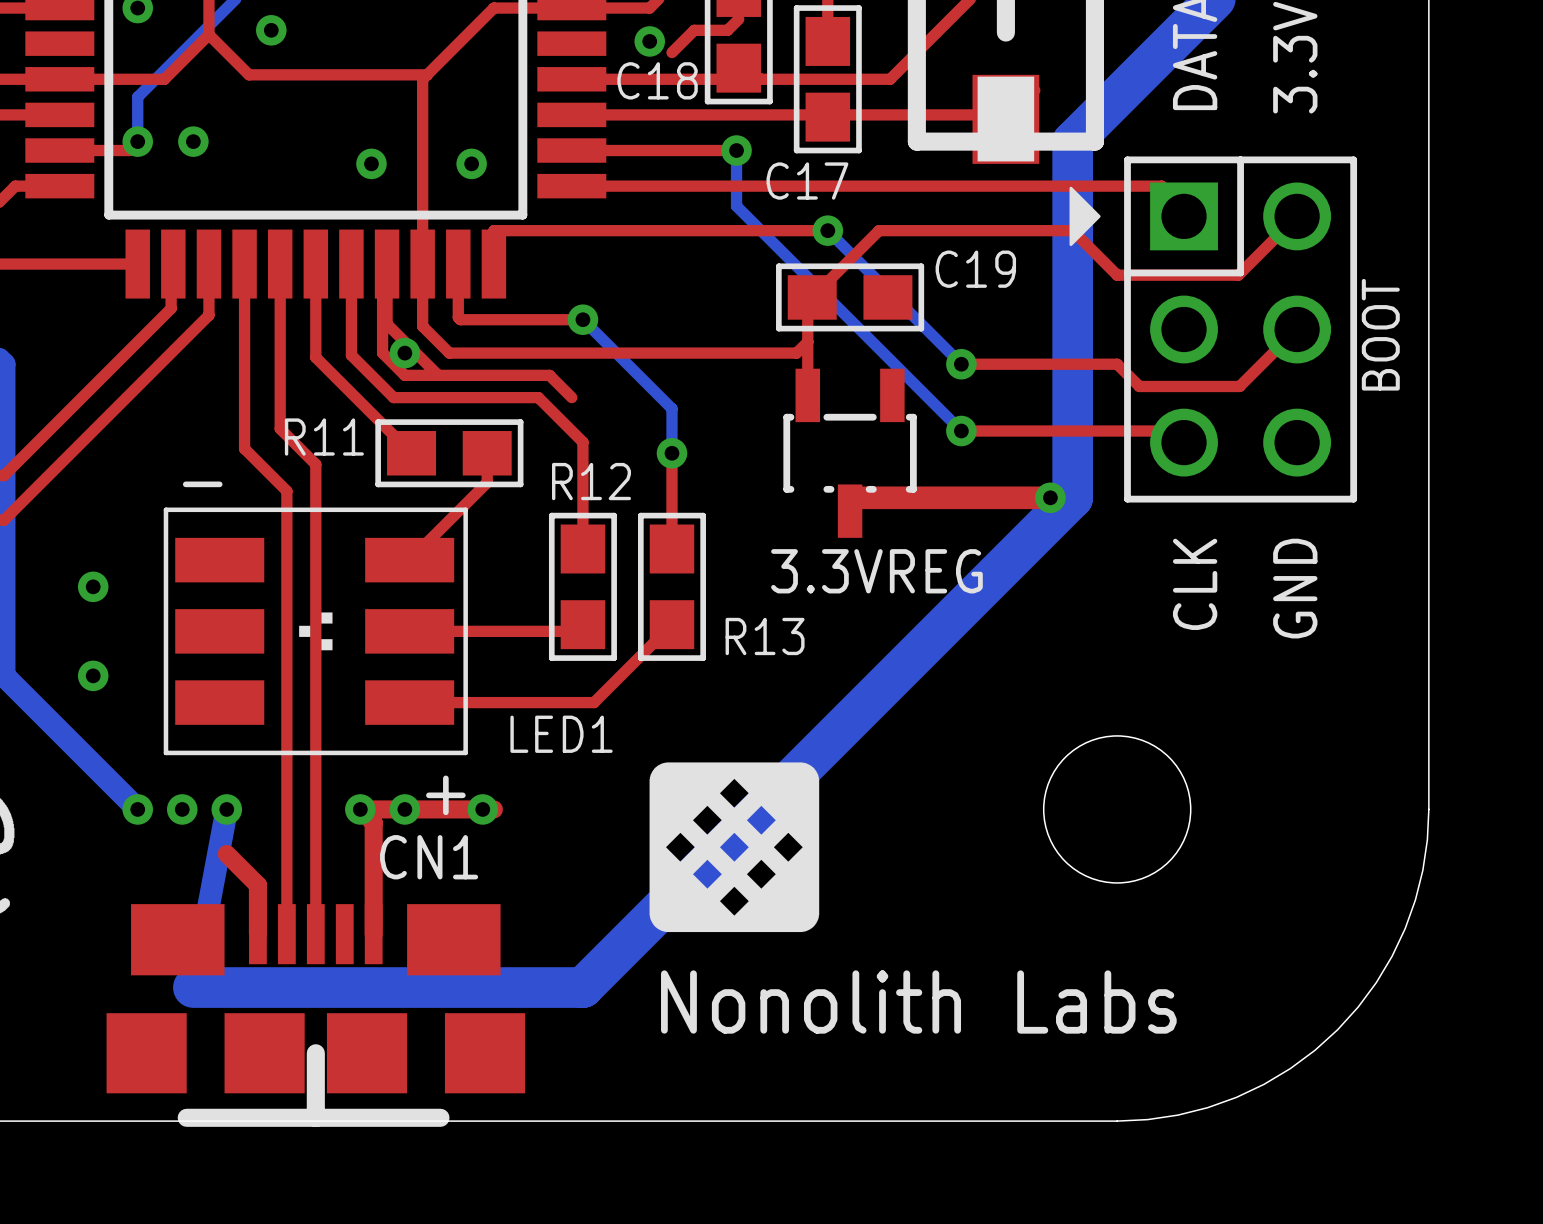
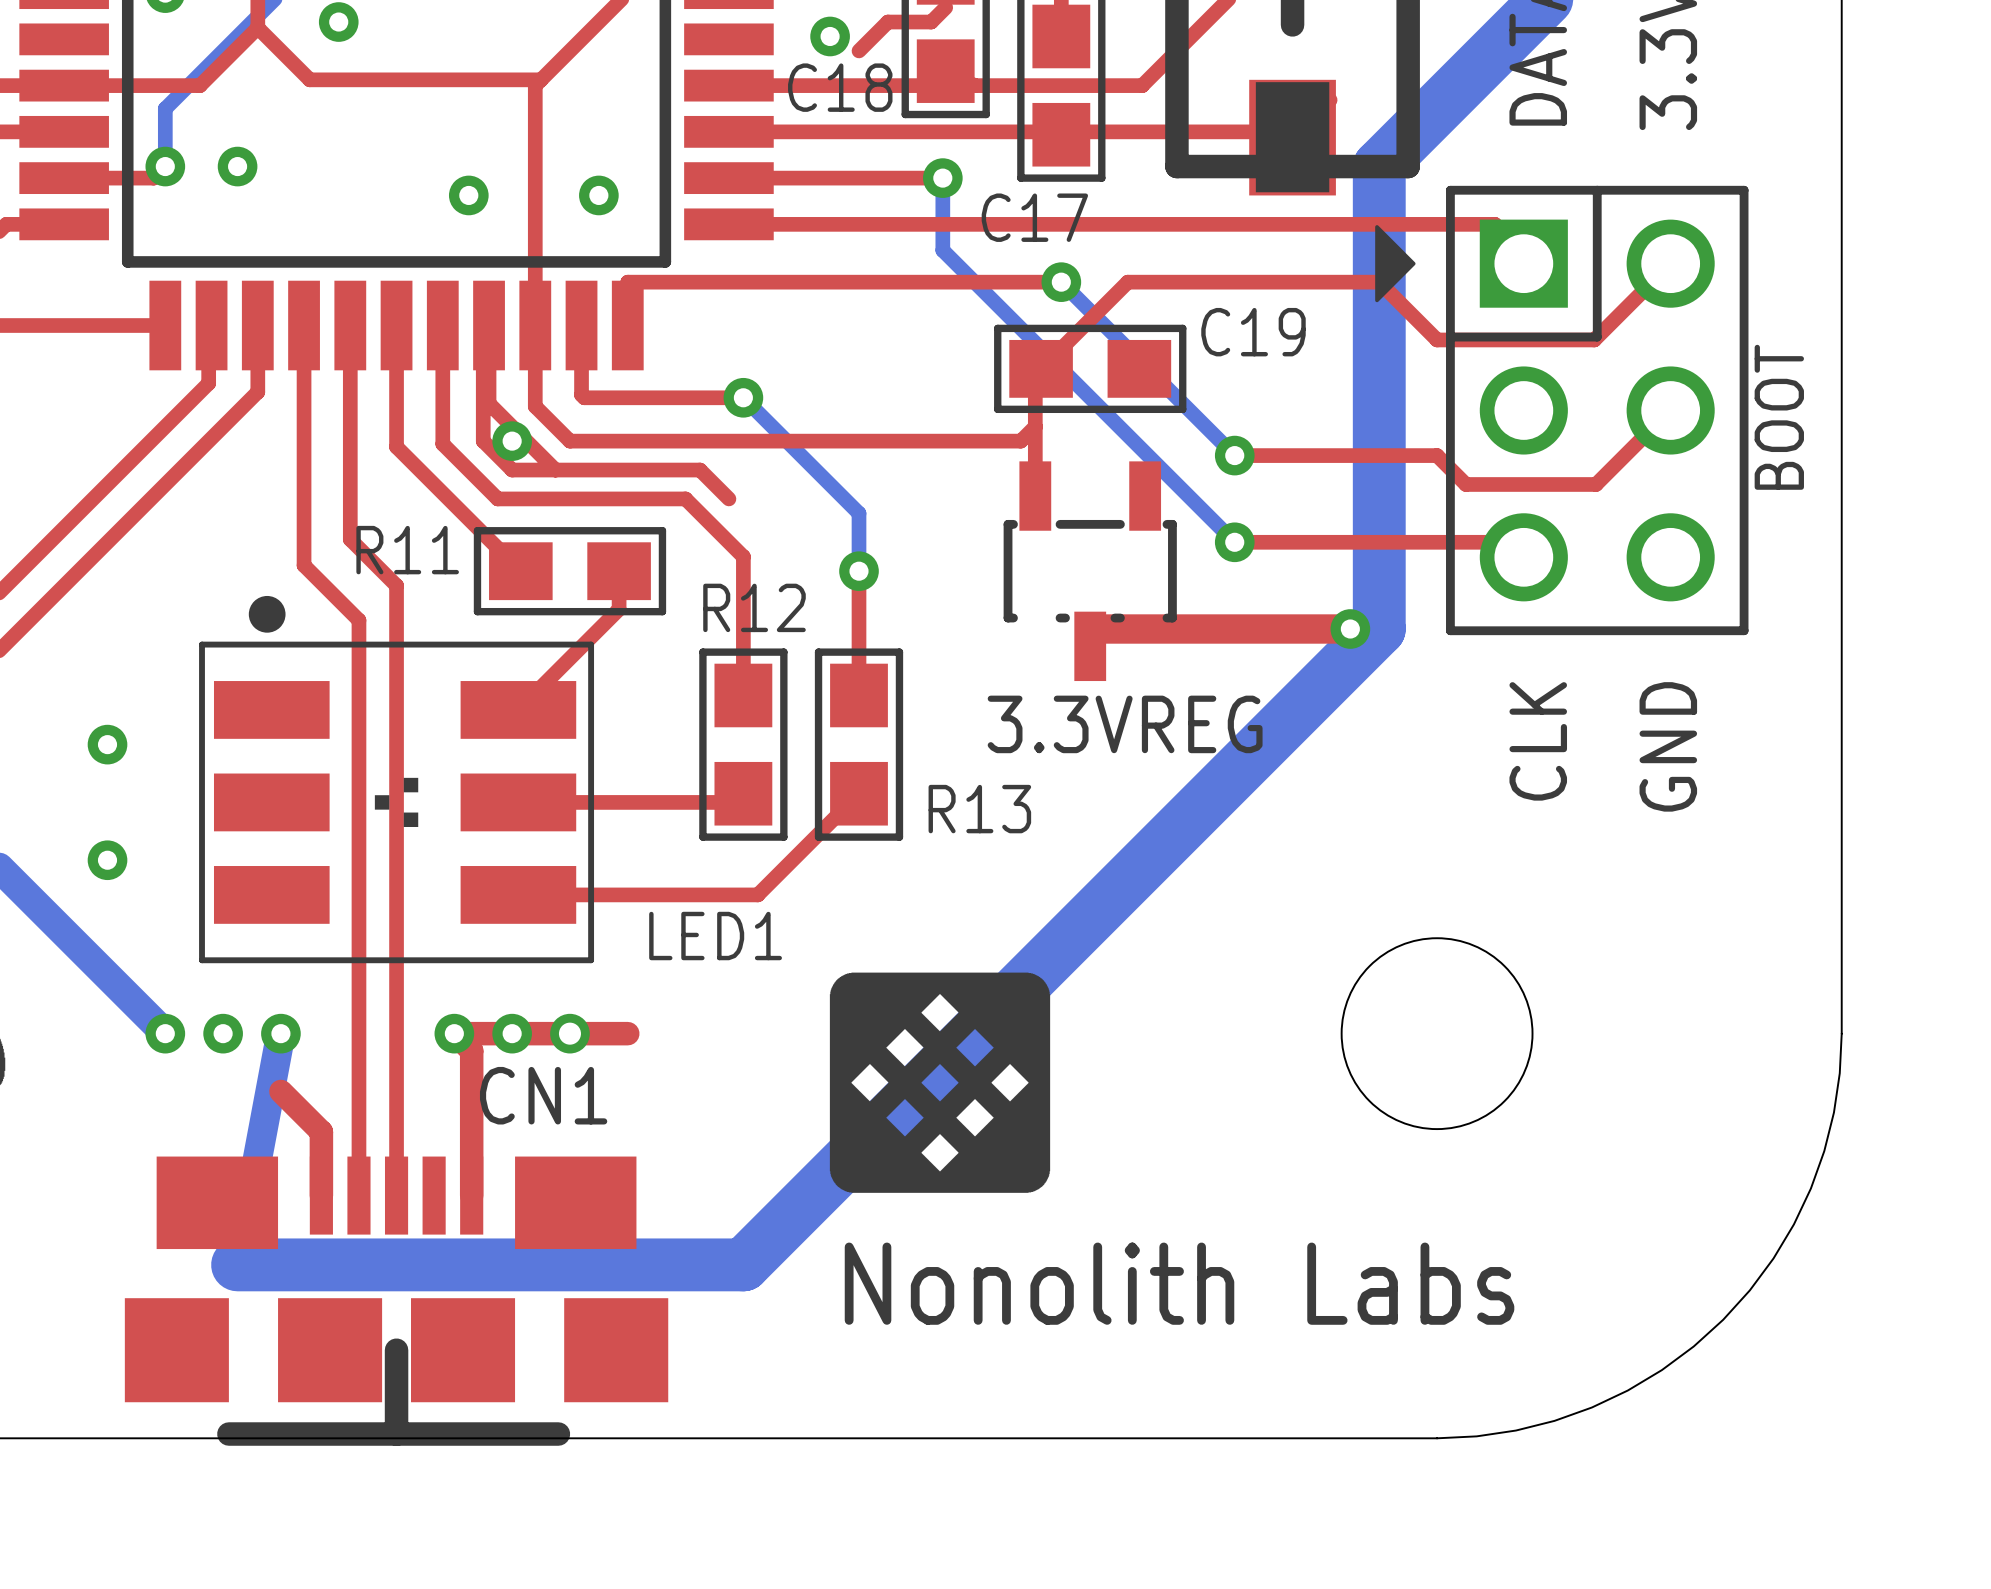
LED1 footprint: [163, 481, 468, 816] -> [199, 595, 595, 964]
via: none -> (569, 1033)
via: (482, 809) -> none

